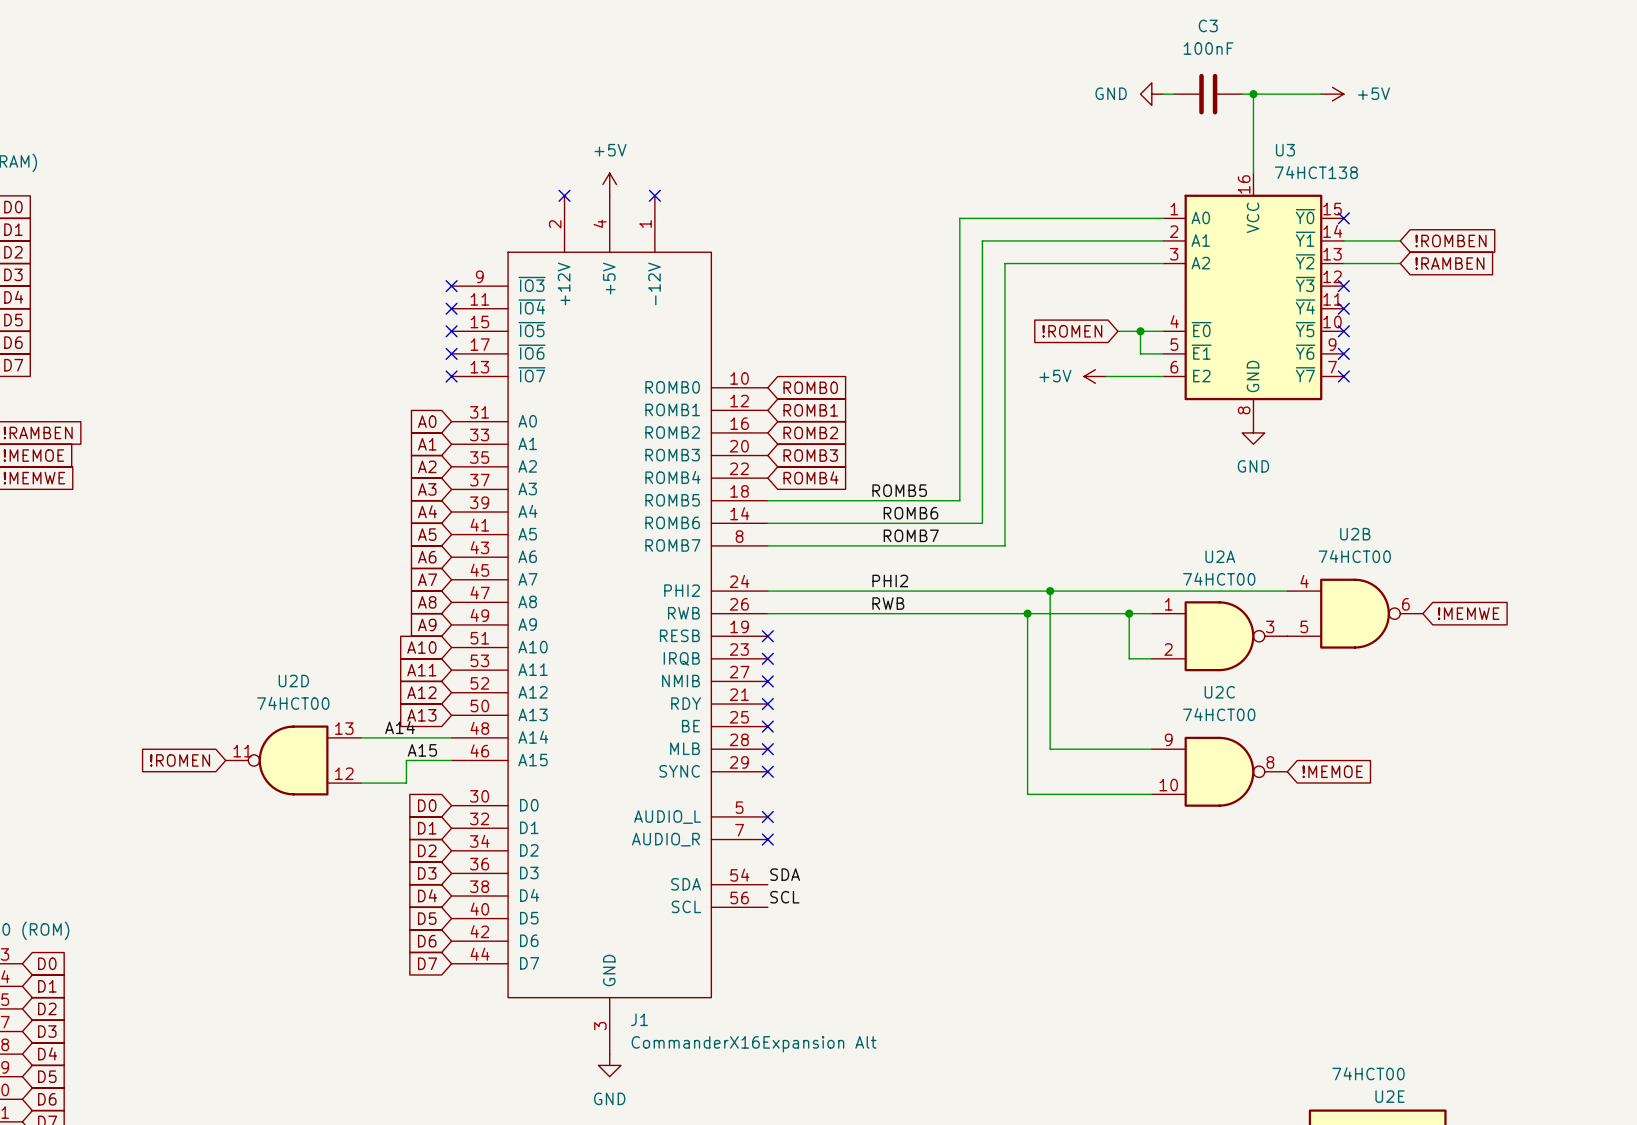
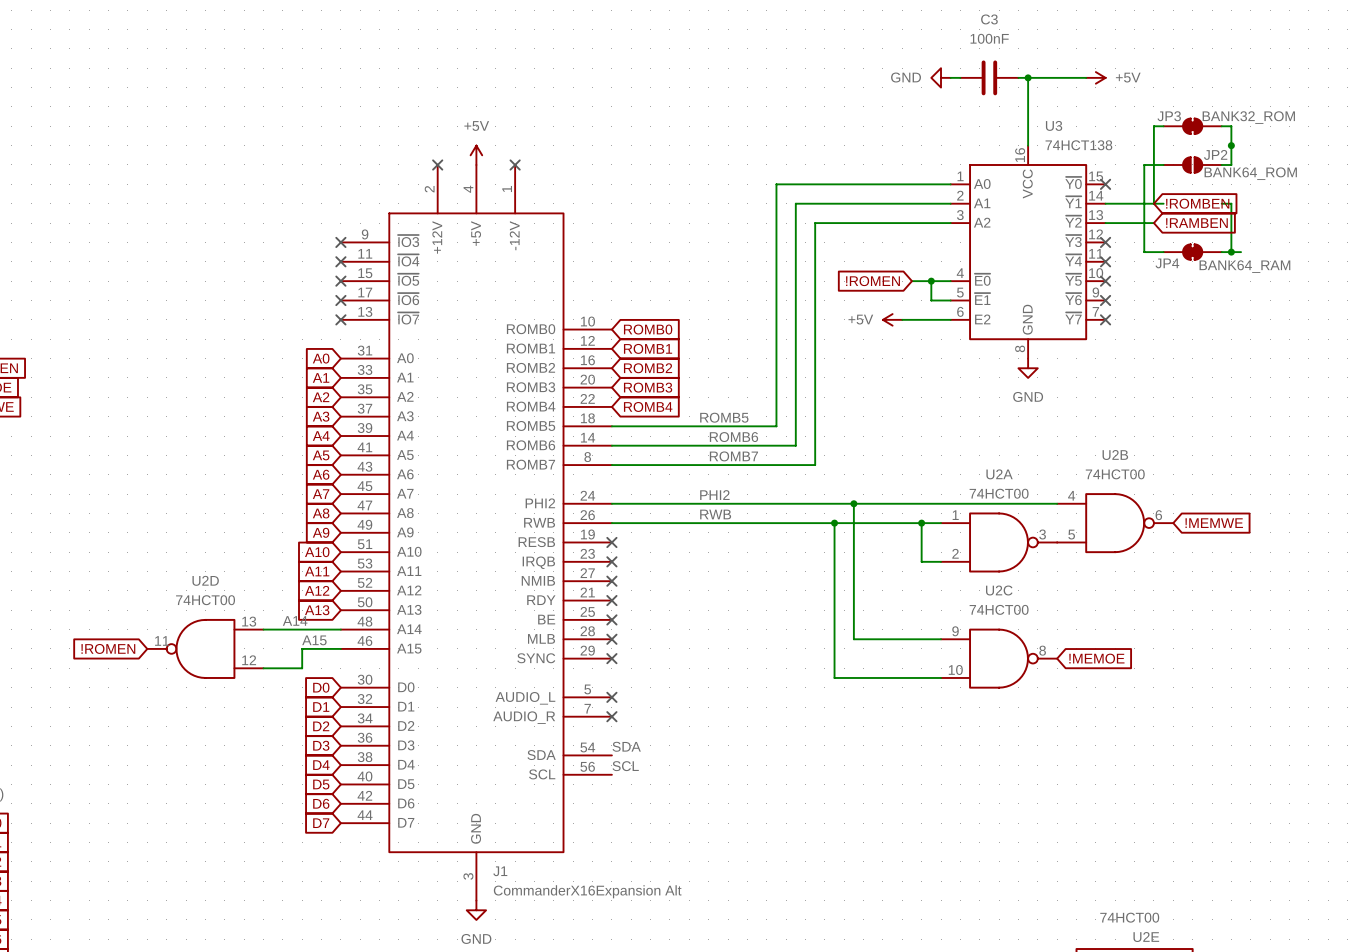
wire: none -> (1163, 126) (1153, 126) (1153, 203) (1163, 203)
JP3: none -> BANK32_ROM (1192, 126)
wire: none -> (1221, 126) (1231, 126) (1231, 164) (1221, 164)
junction: none -> (1231, 145)
wire: none -> (1163, 164) (1144, 164) (1144, 252) (1163, 252)
JP2: none -> BANK64_ROM (1192, 164)
wire: none -> (1221, 203) (1231, 203) (1231, 252)
JP4: none -> BANK64_RAM (1192, 252)
wire: none -> (1221, 252) (1241, 252)
junction: none -> (1231, 252)

